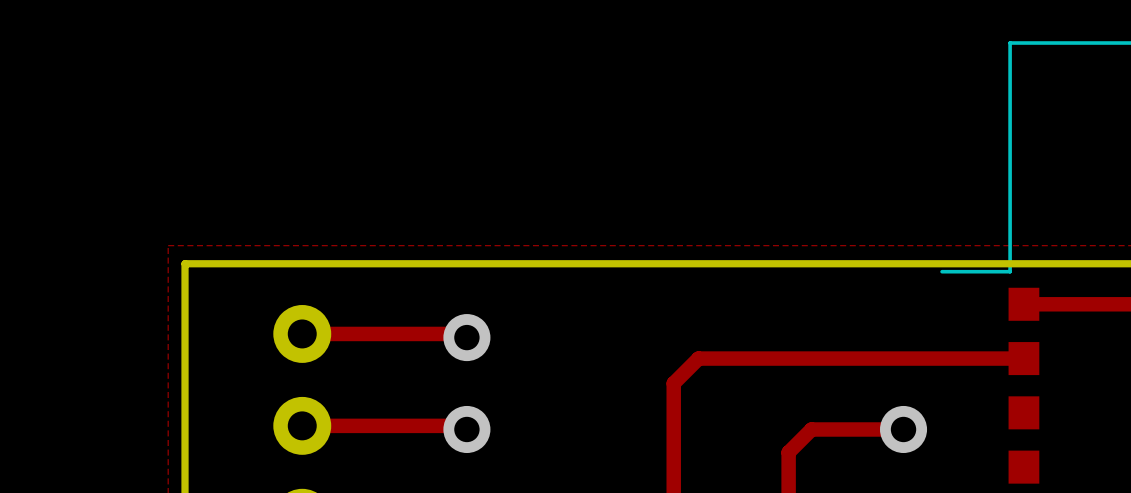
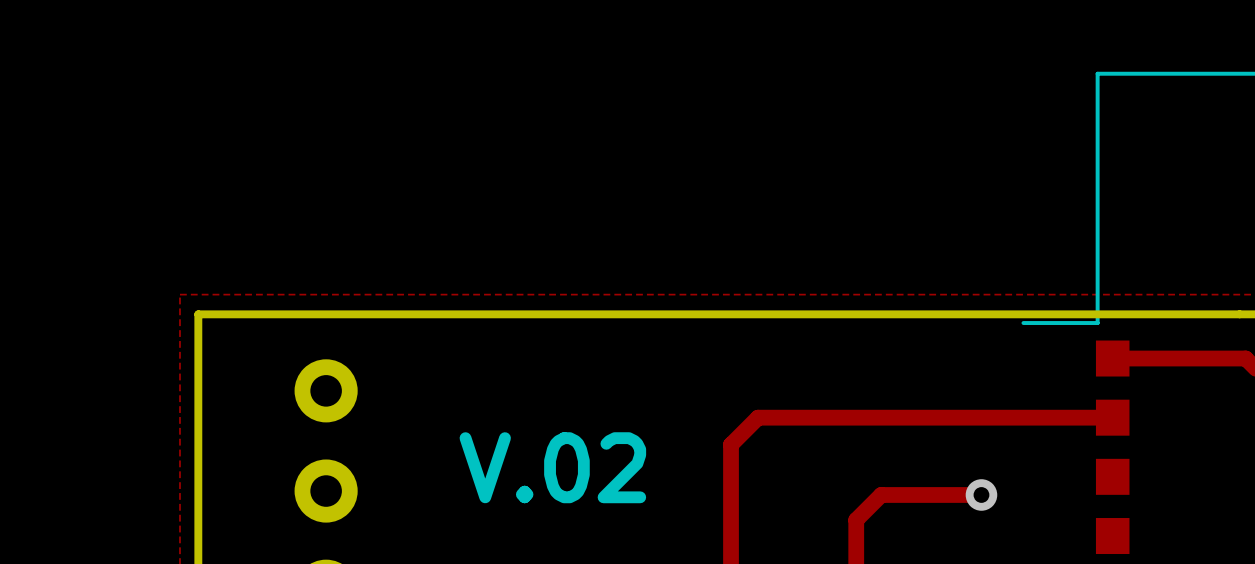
track: (302, 333) (463, 333) (466, 337) -> none
via: (466, 337) -> none
text: none -> V.02 (552, 467)
via size: [880, 405, 928, 454] -> [965, 479, 998, 511]
track: (302, 425) (463, 425) (466, 429) -> none
via: (466, 429) -> none

